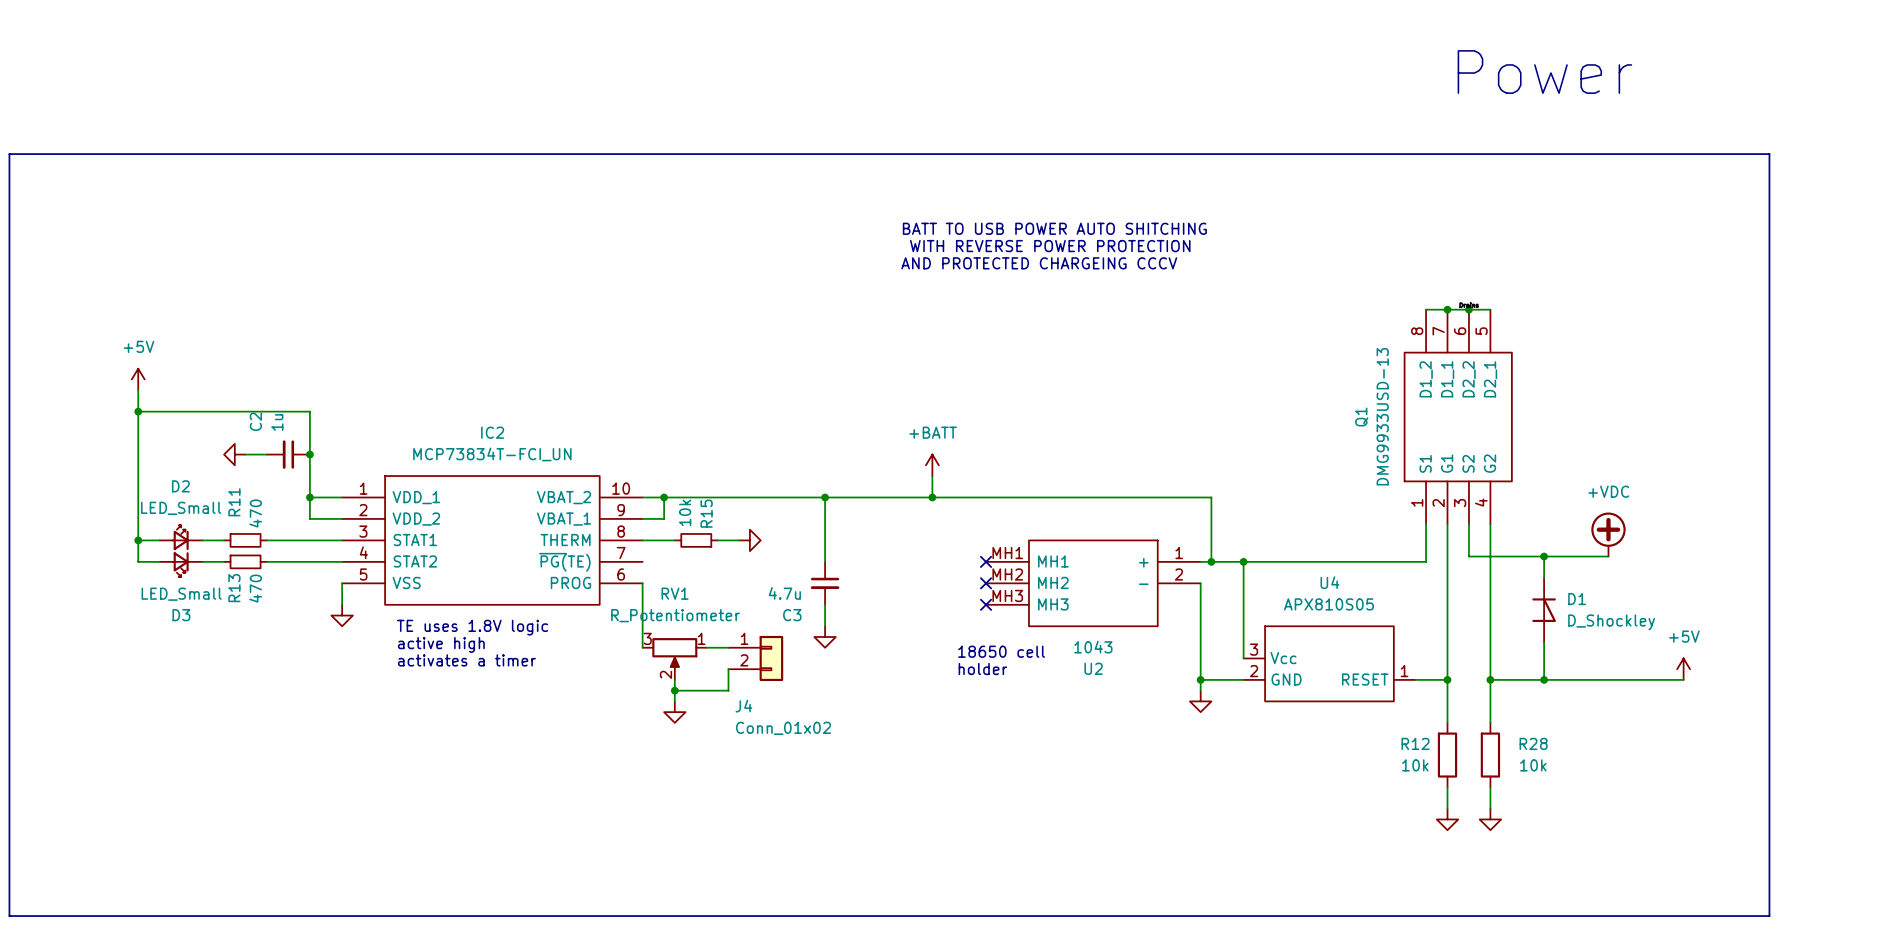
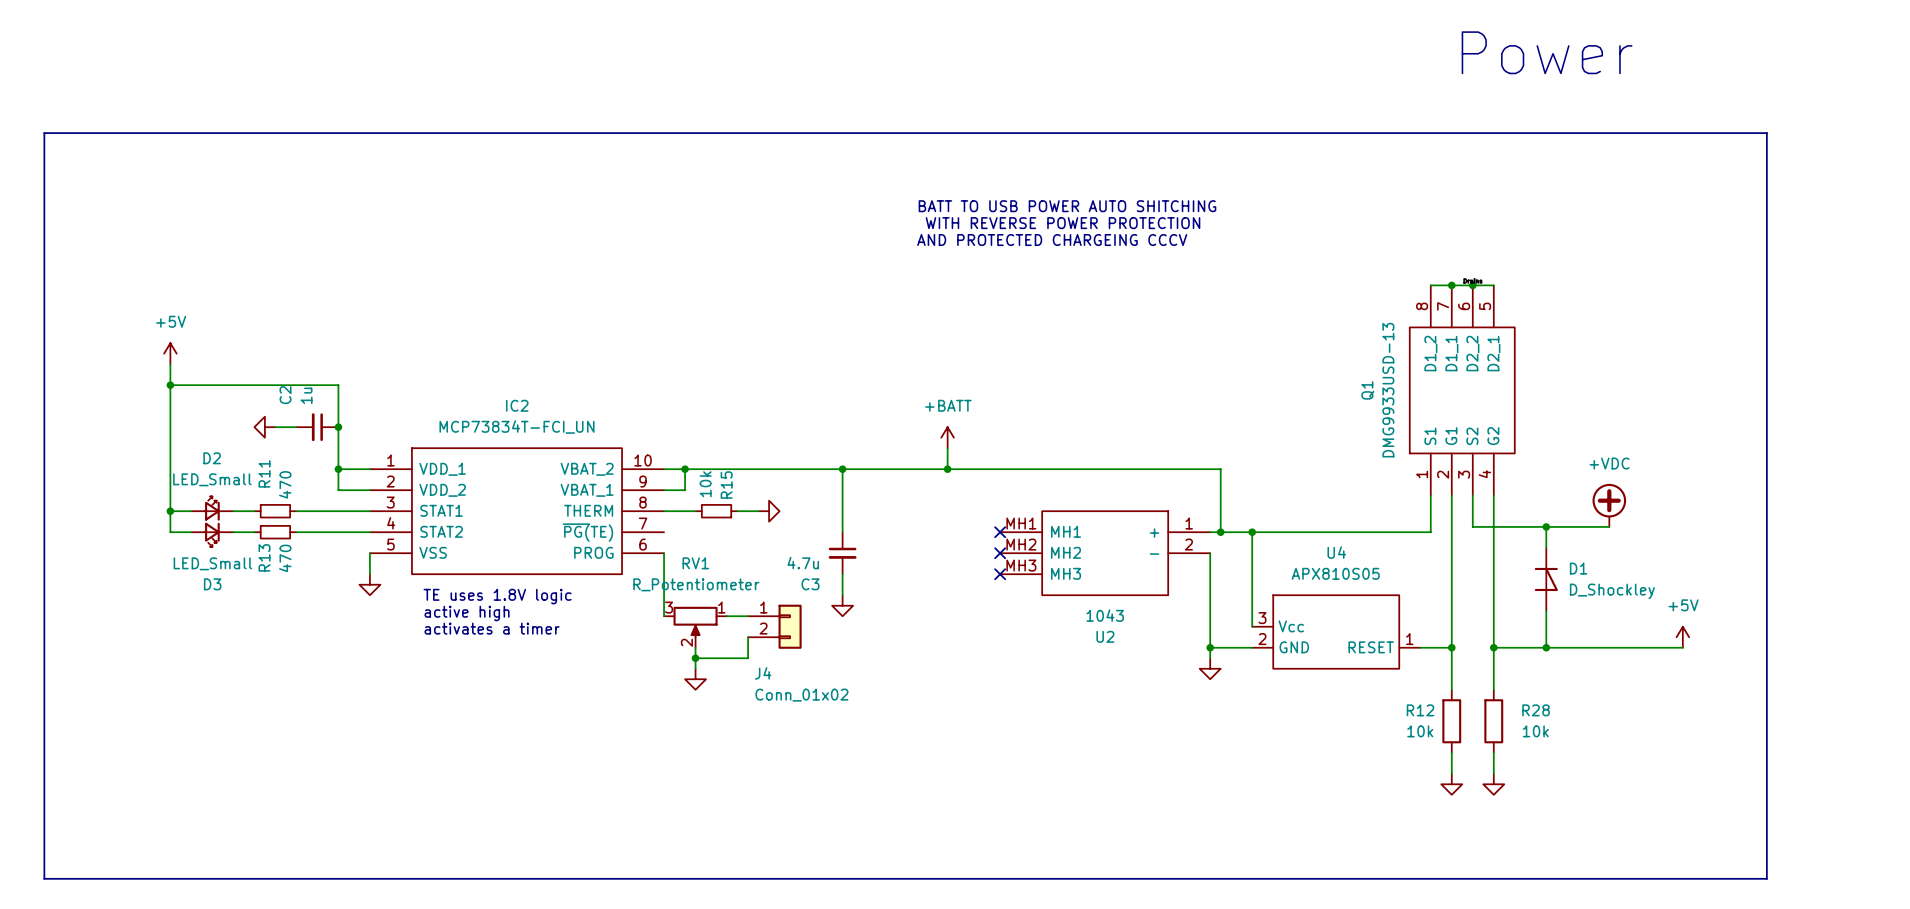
text: 18650 cell (1001, 651) -> none
text: holder (982, 668) -> none

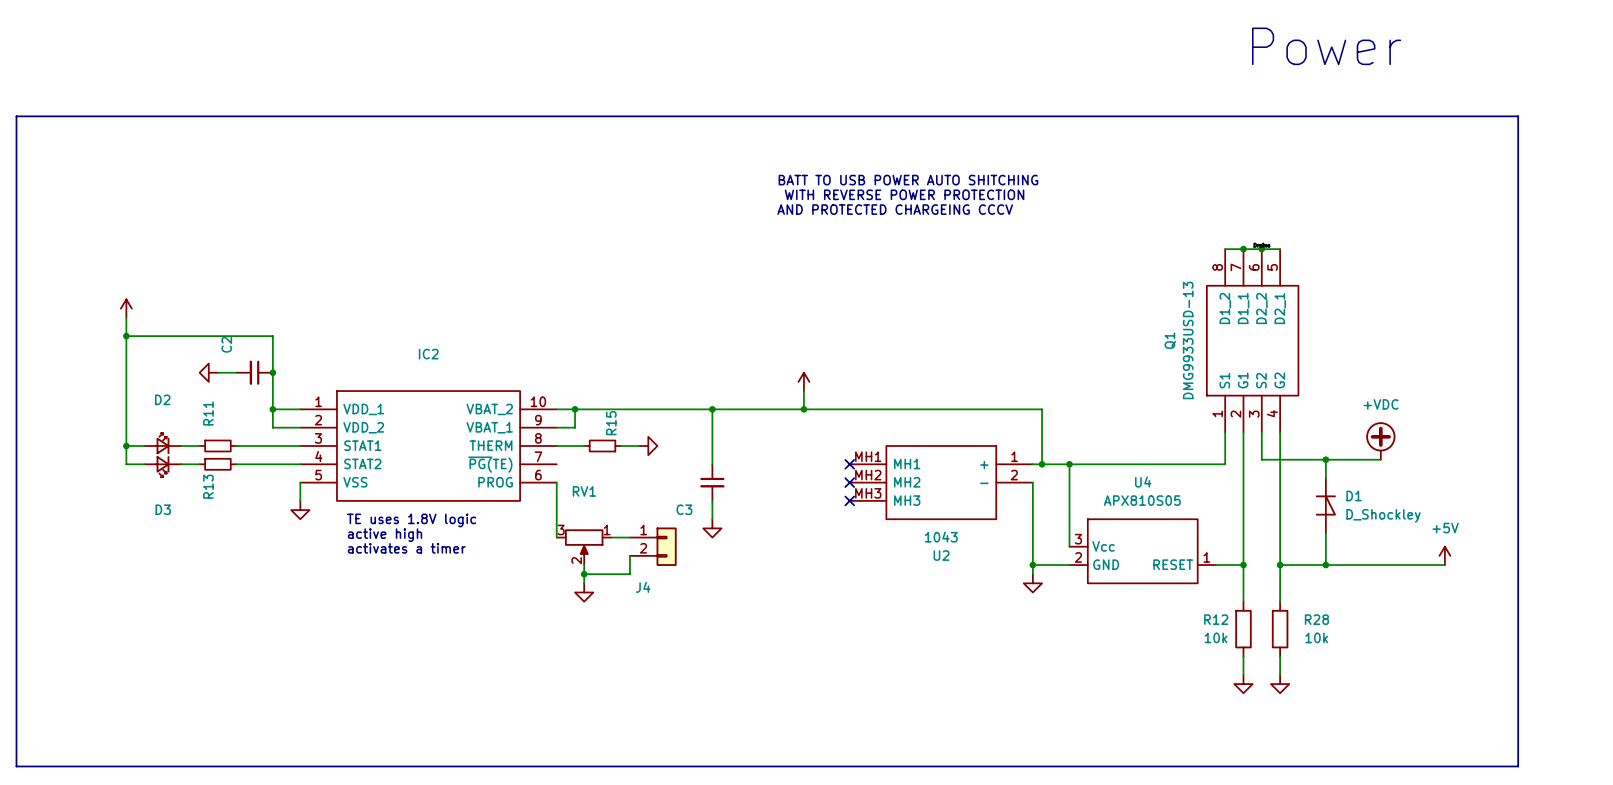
power symbol text: +5V (171, 321) -> none
C2 value: 1u (306, 395) -> none
power symbol text: +BATT (948, 405) -> none
IC2 value: MCP73834T-FCI_UN (516, 427) -> none
D2 value: LED_Small (212, 479) -> none
R11 value: 470 (285, 484) -> none
R15 value: 10k (705, 484) -> none
R13 value: 470 (285, 558) -> none
D3 value: LED_Small (212, 563) -> none
C3 value: 4.7u (803, 563) -> none
RV1 value: R_Potentiometer (696, 584) -> none
J4 value: Conn_01x02 (801, 695) -> none

